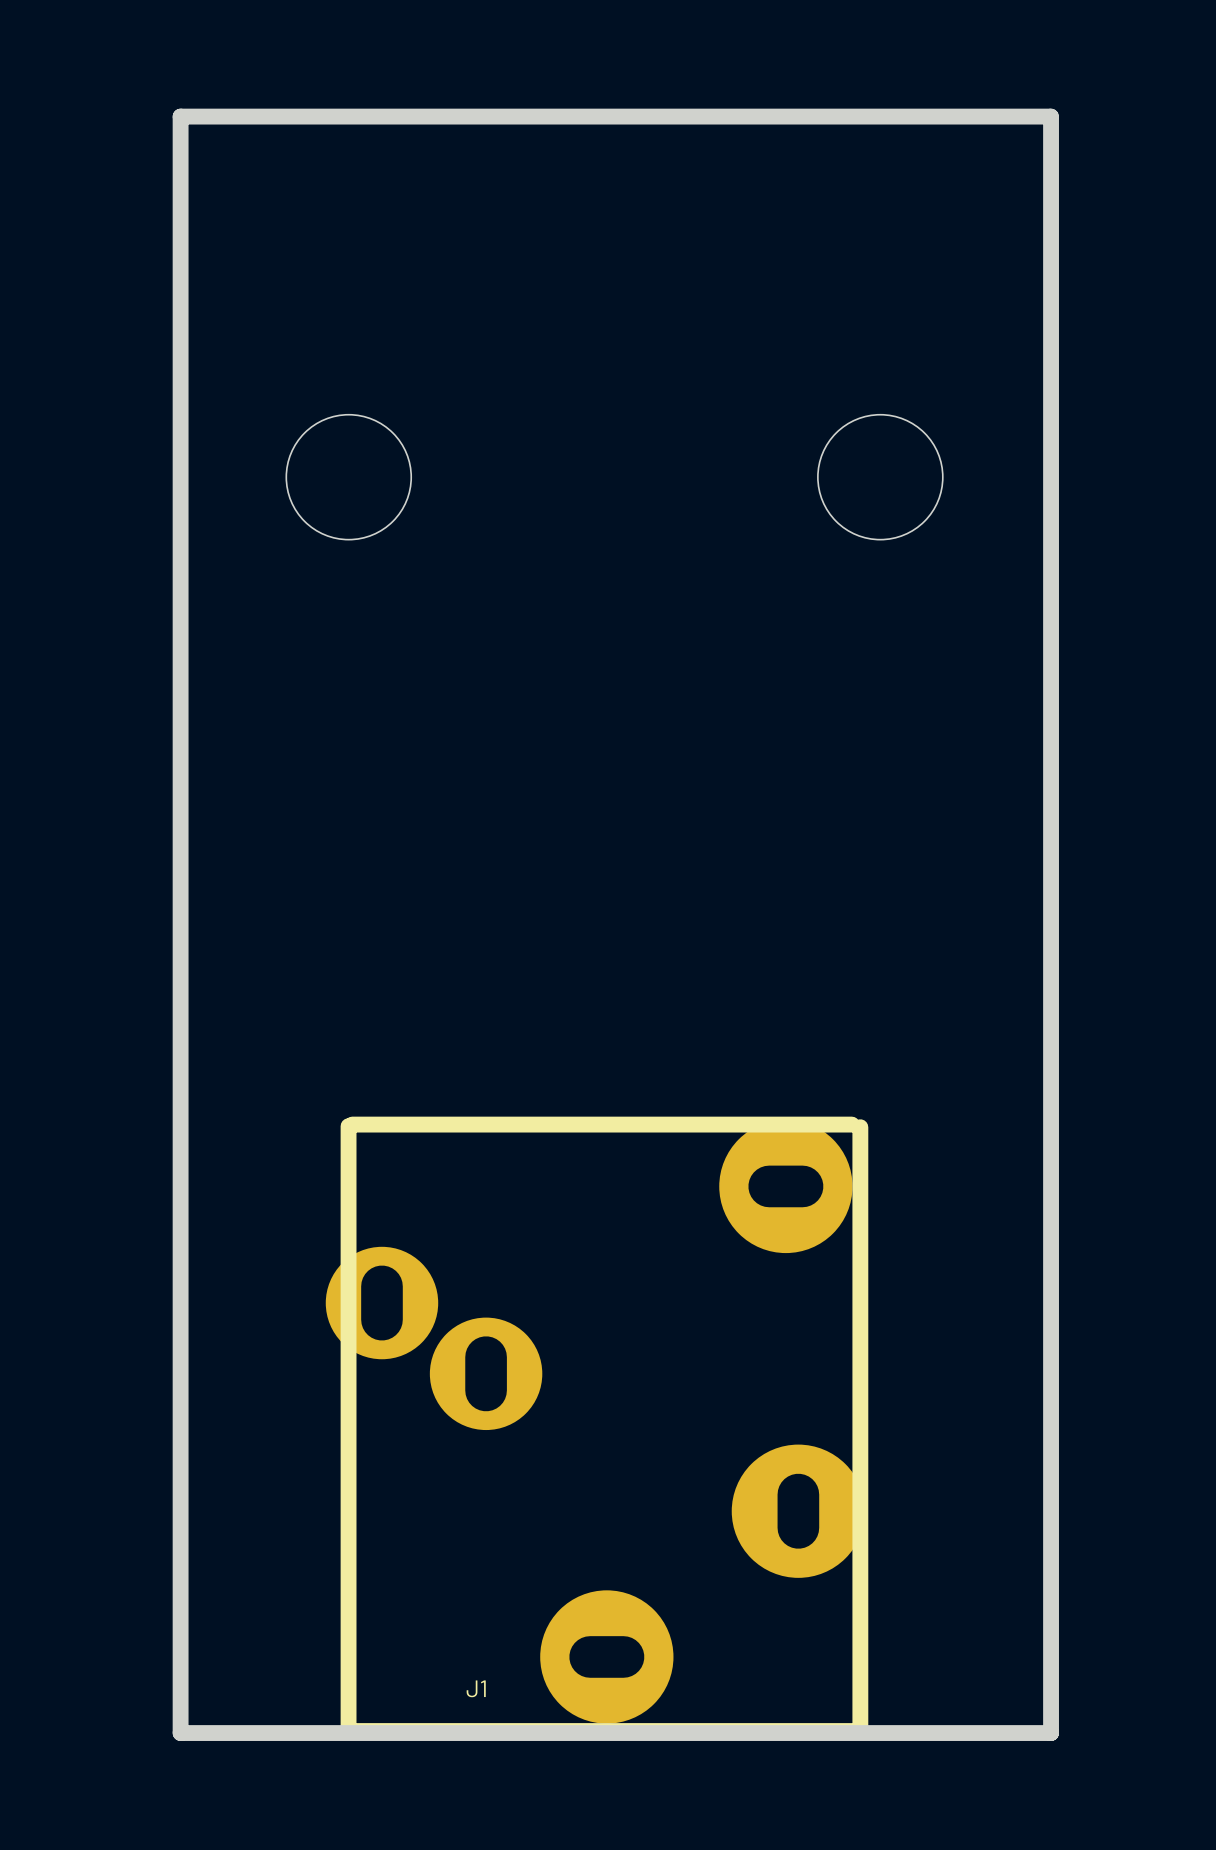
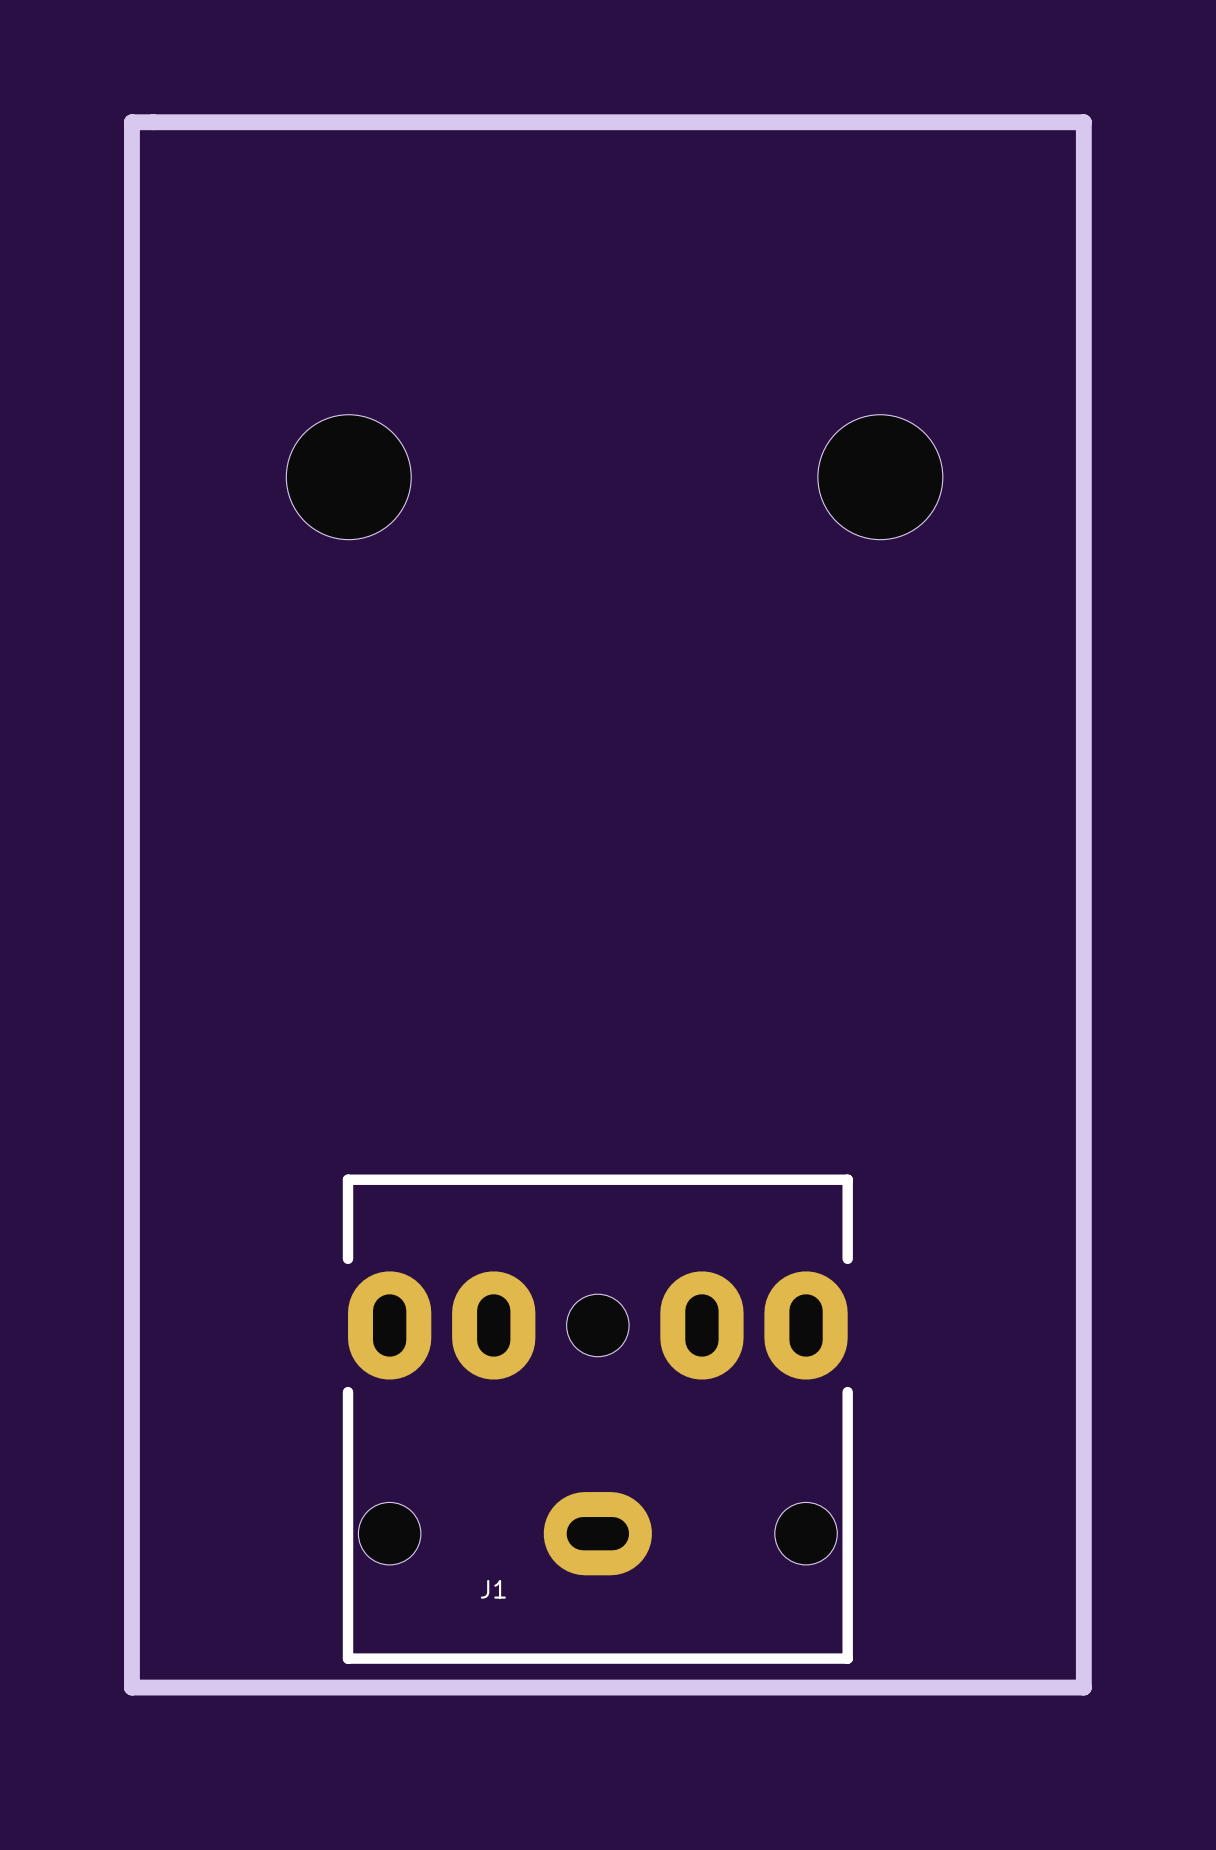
board edge: (1050, 116) (180, 116) (180, 1733) (1051, 1733) (1051, 116) -> (131, 122) (131, 1687) (1083, 1687) (1083, 122) (131, 122)
J1 footprint: [325, 1116, 869, 1739] -> [342, 1174, 853, 1664]
J1 name position: J1 (476, 1688) -> J1 (493, 1589)

